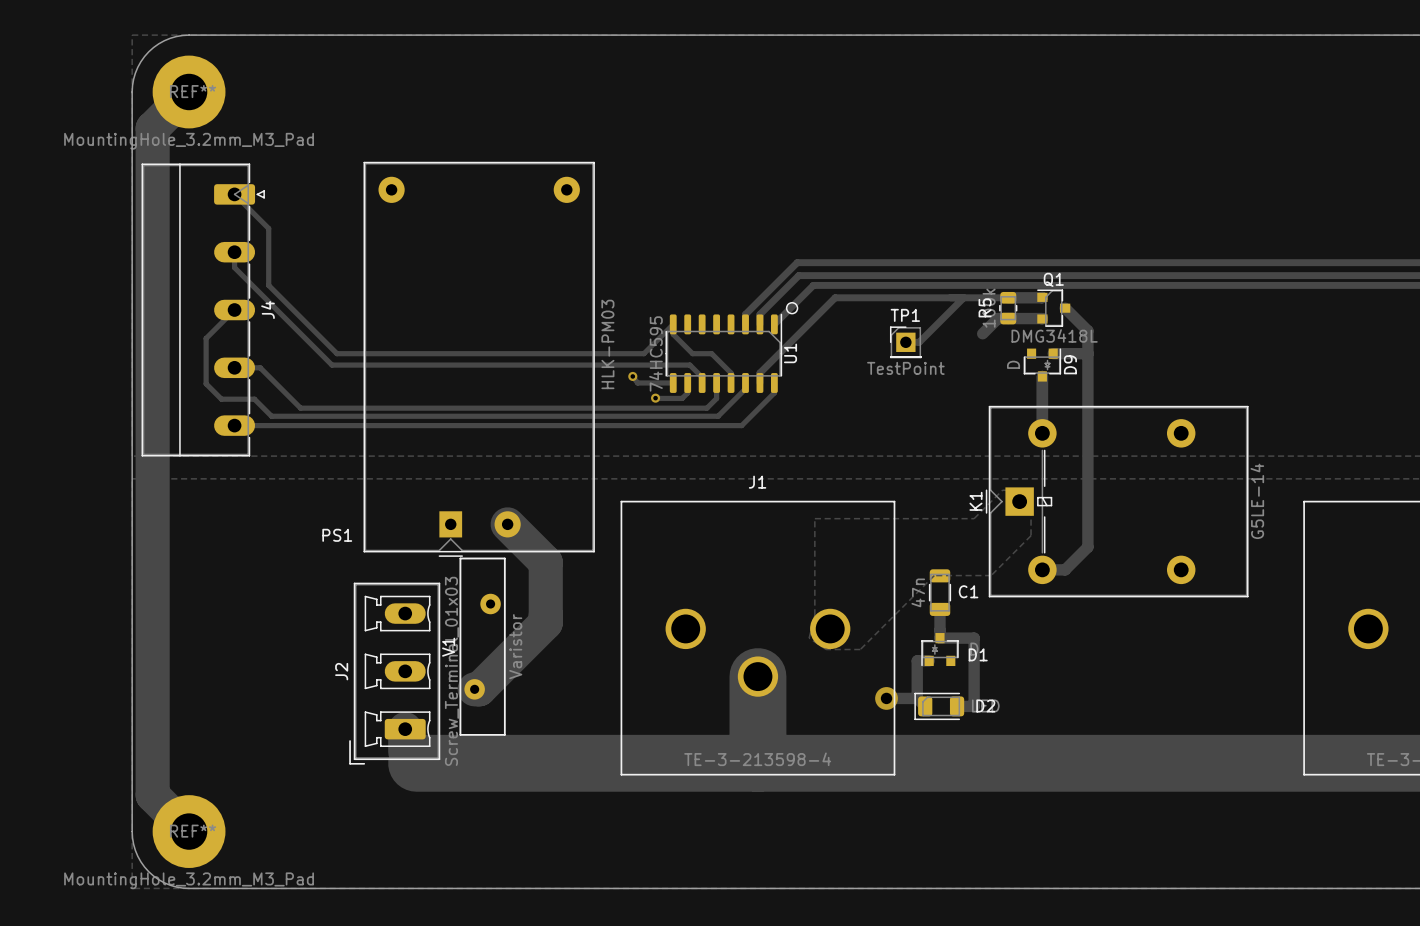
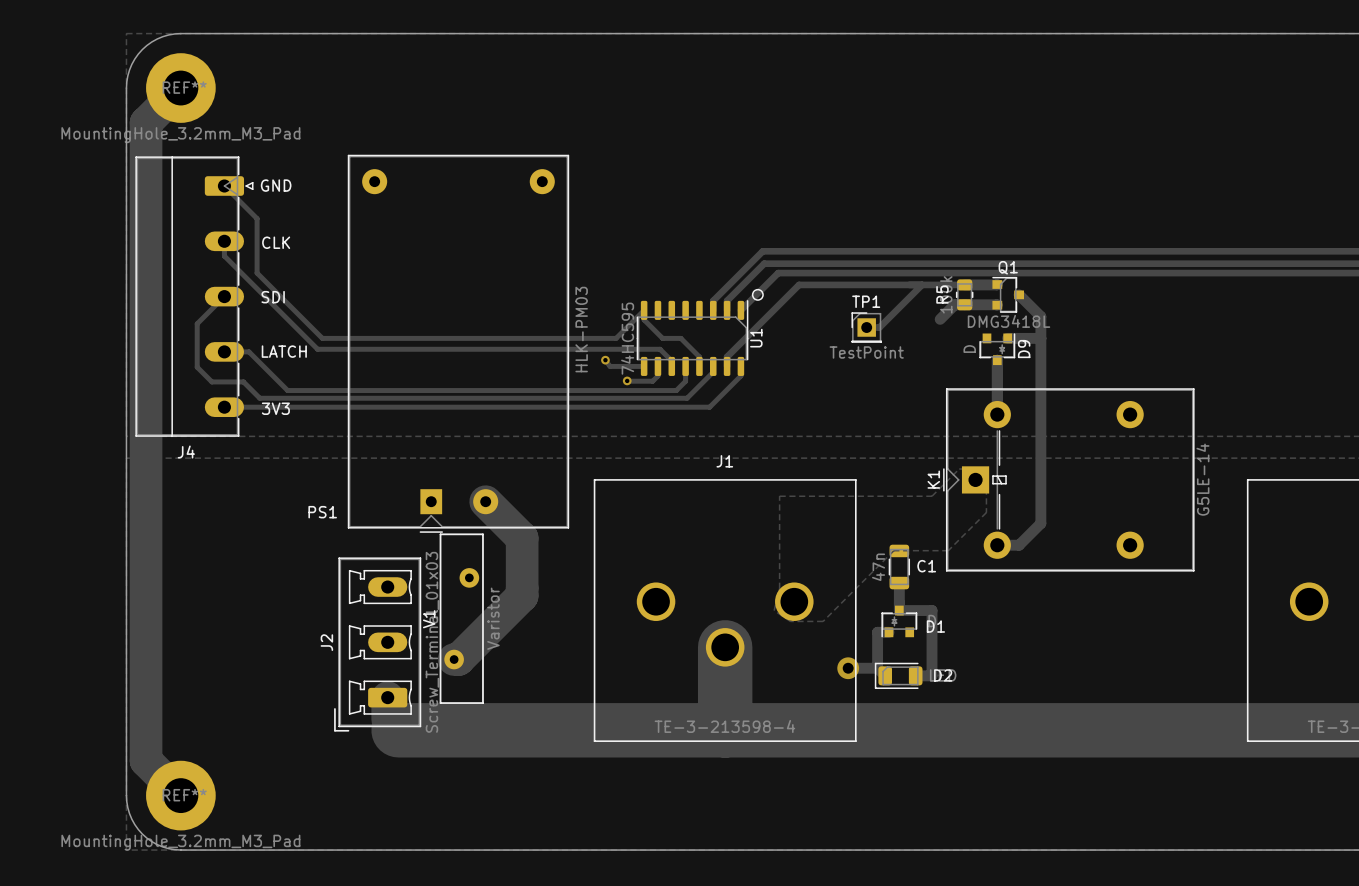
text: none -> GND (276, 185)
text: none -> CLK (276, 242)
J4 name rotation: 0° (268, 310) -> 90° clockwise (186, 452)
J4 name position: J4 (268, 310) -> J4 (186, 452)
text: none -> SDI (273, 297)
text: none -> LATCH (284, 351)
text: none -> 3V3 (275, 408)

